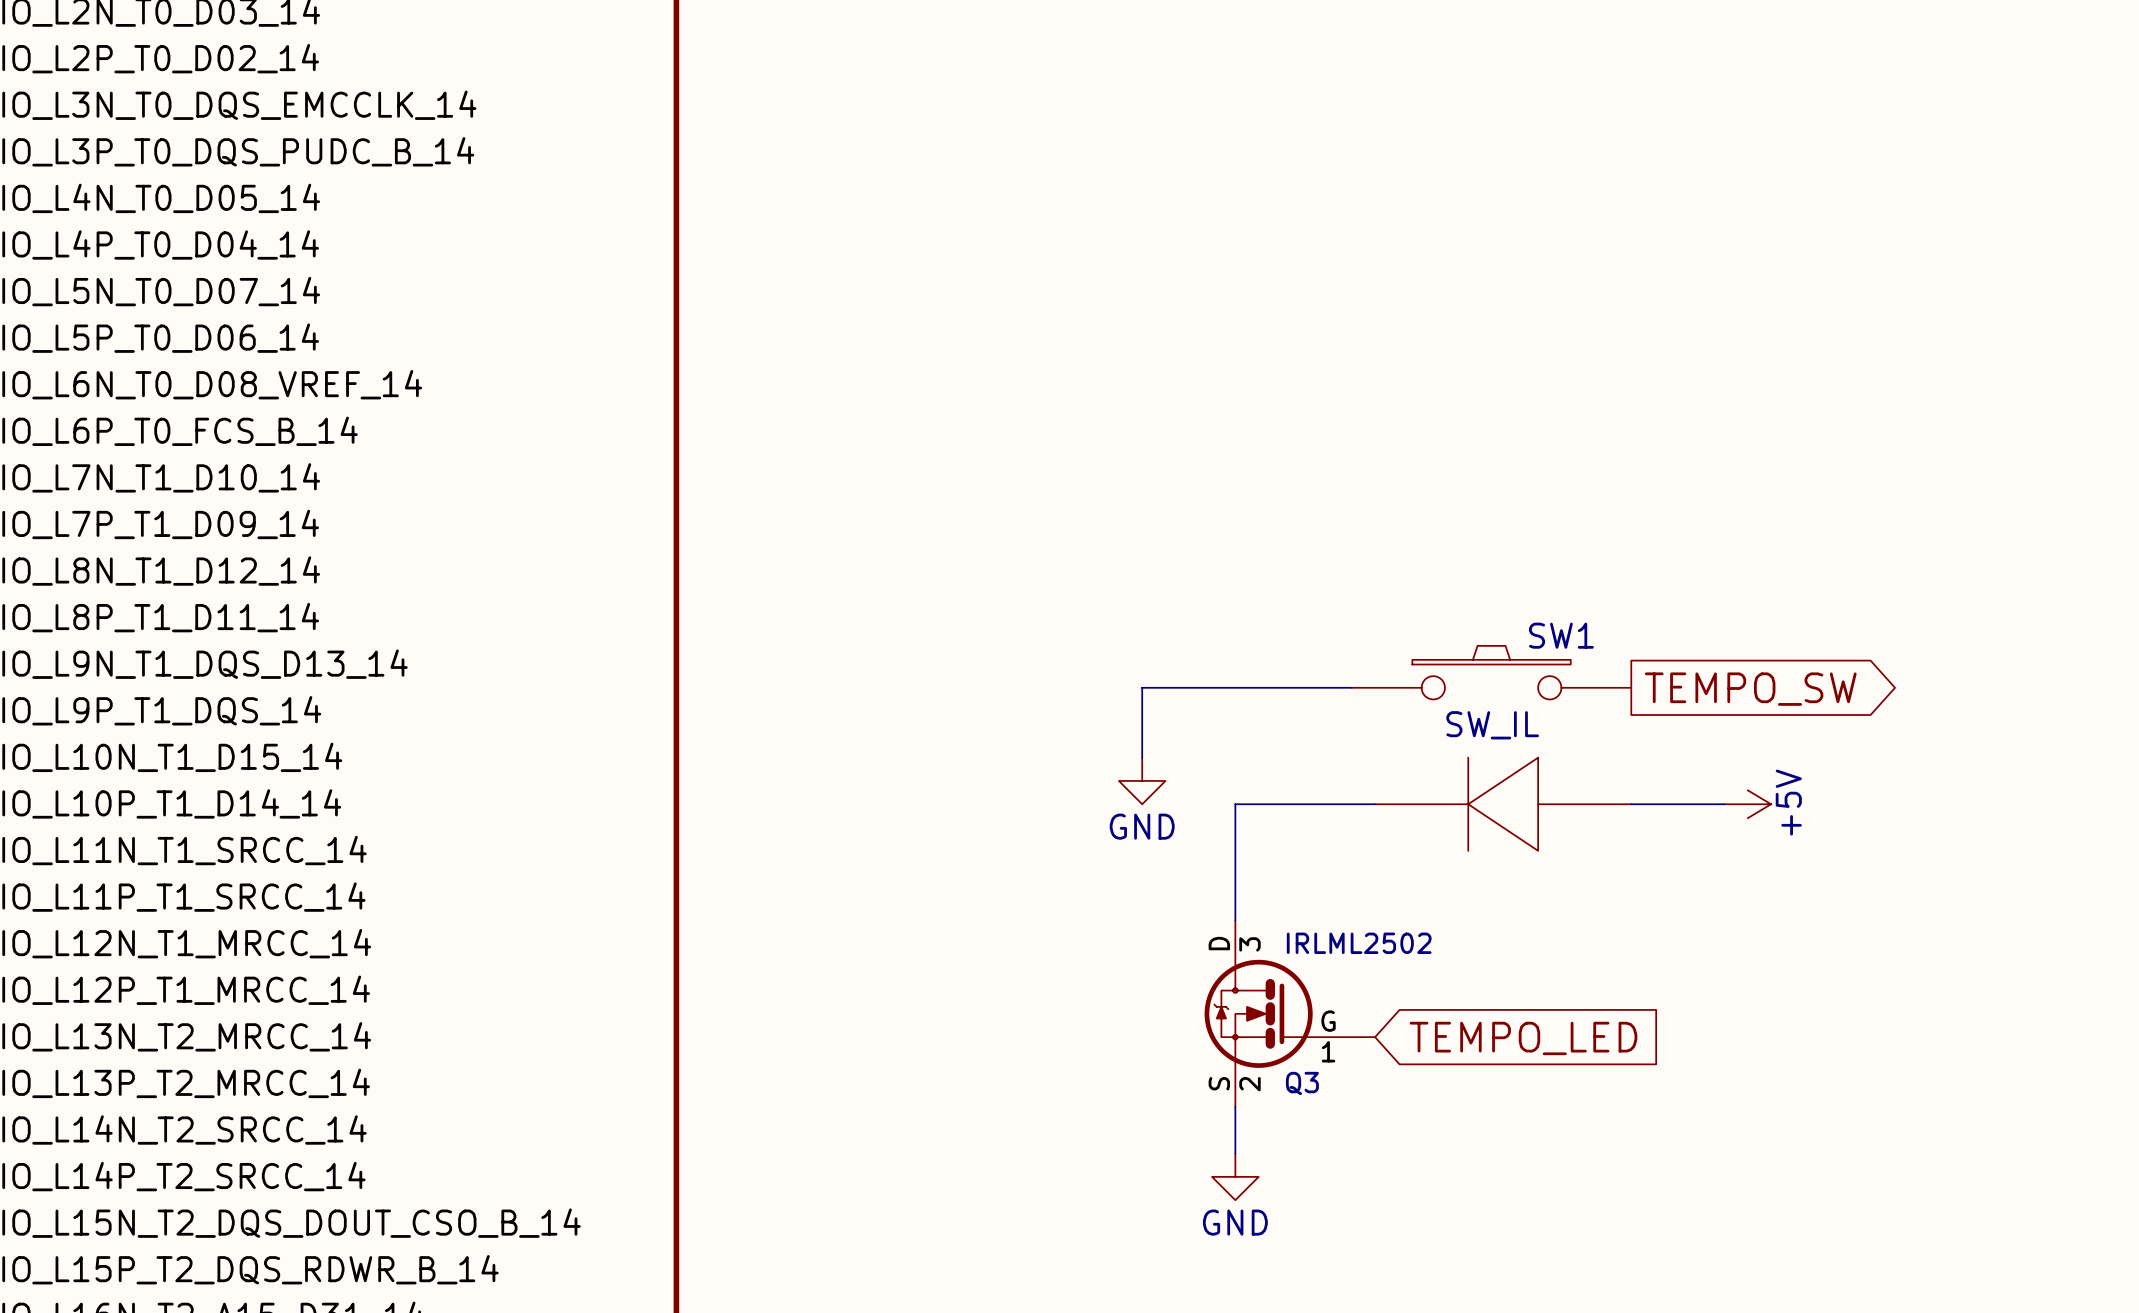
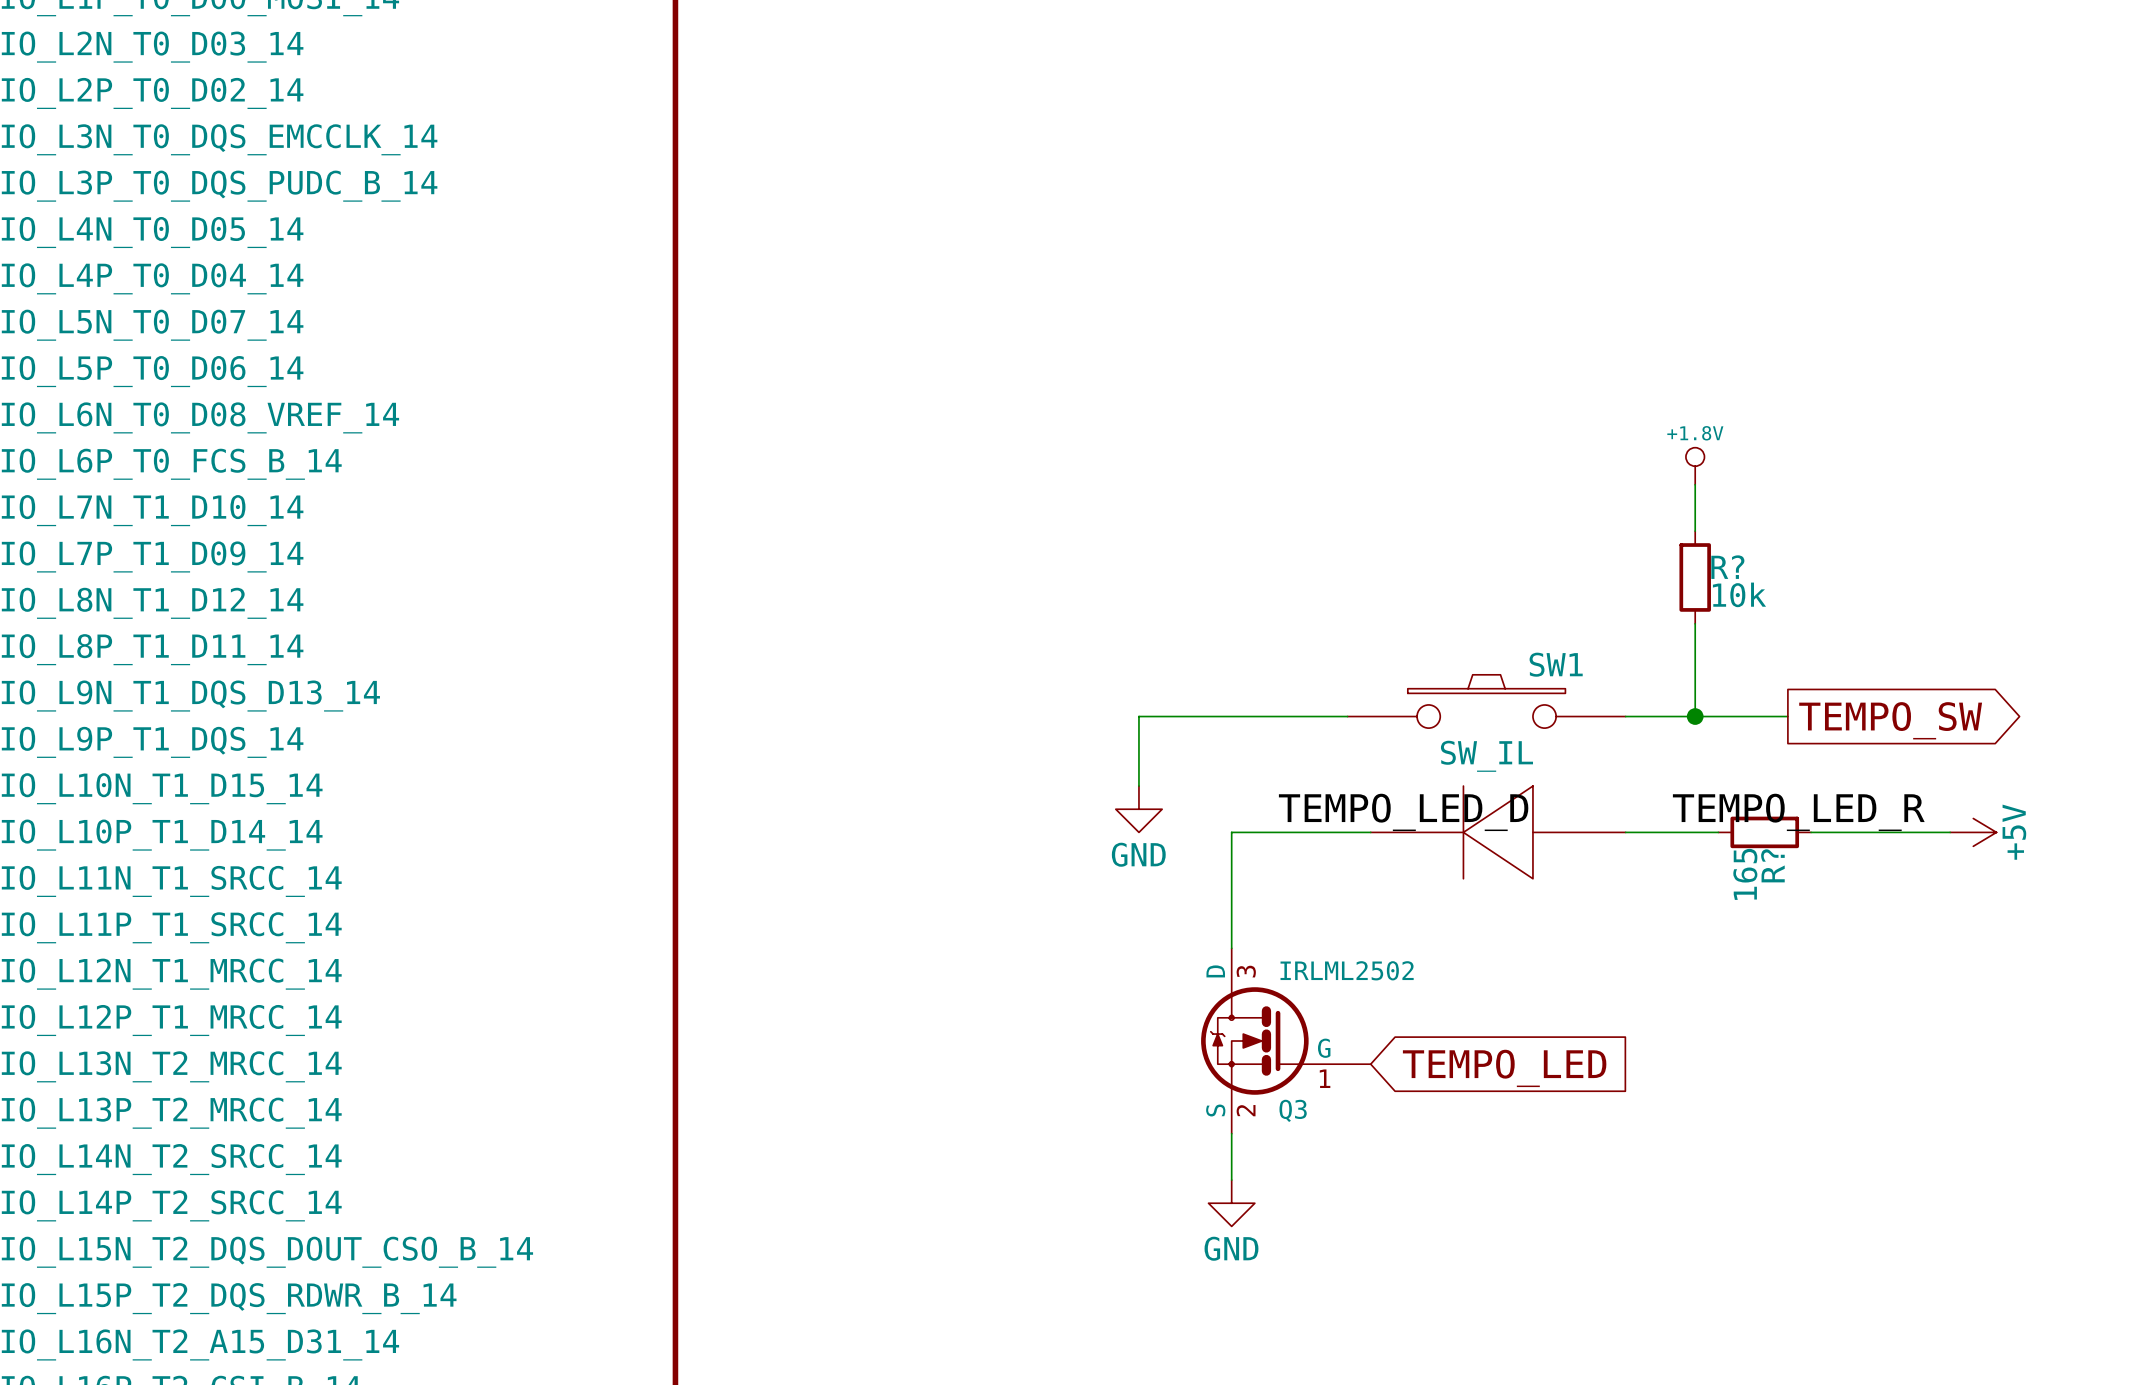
power symbol: none -> +1.8V (1695, 466)
wire: none -> (1695, 484) (1695, 531)
R?: none -> 10k (1695, 577)
wire: none -> (1695, 623) (1695, 716)
wire: none -> (1625, 716) (1787, 716)
junction: none -> (1695, 716)
global label position: TEMPO_SW (1750, 689) -> TEMPO_SW (1890, 720)
label: none -> TEMPO_LED_D (1403, 812)
label: none -> TEMPO_LED_R (1798, 812)
power symbol position: +5V (1747, 804) -> +5V (1973, 832)
R?: none -> 165 (1764, 832)
wire: none -> (1811, 832) (1950, 832)

